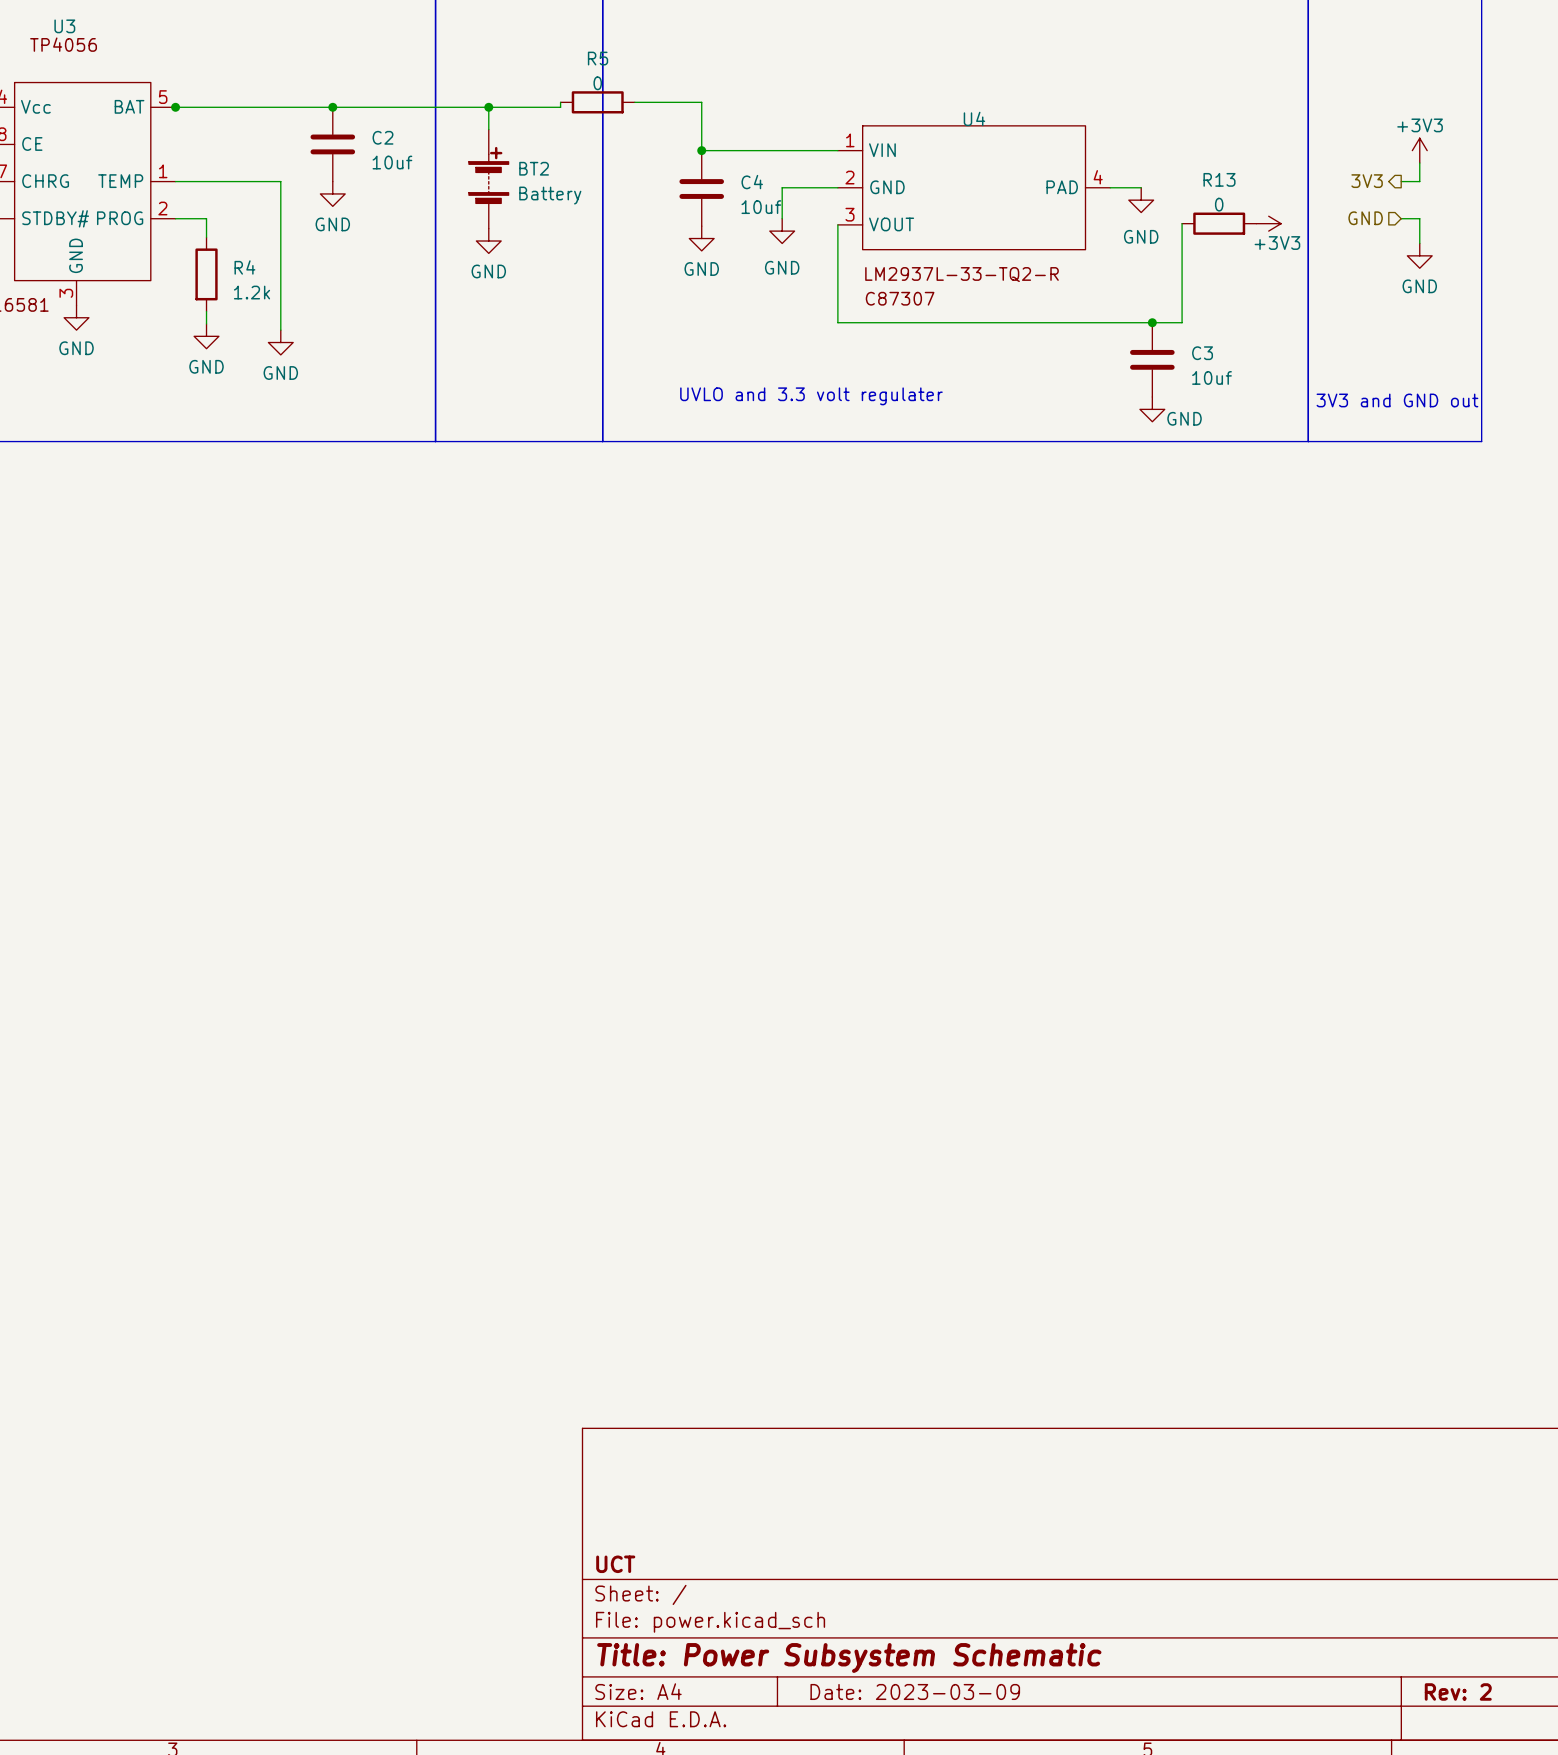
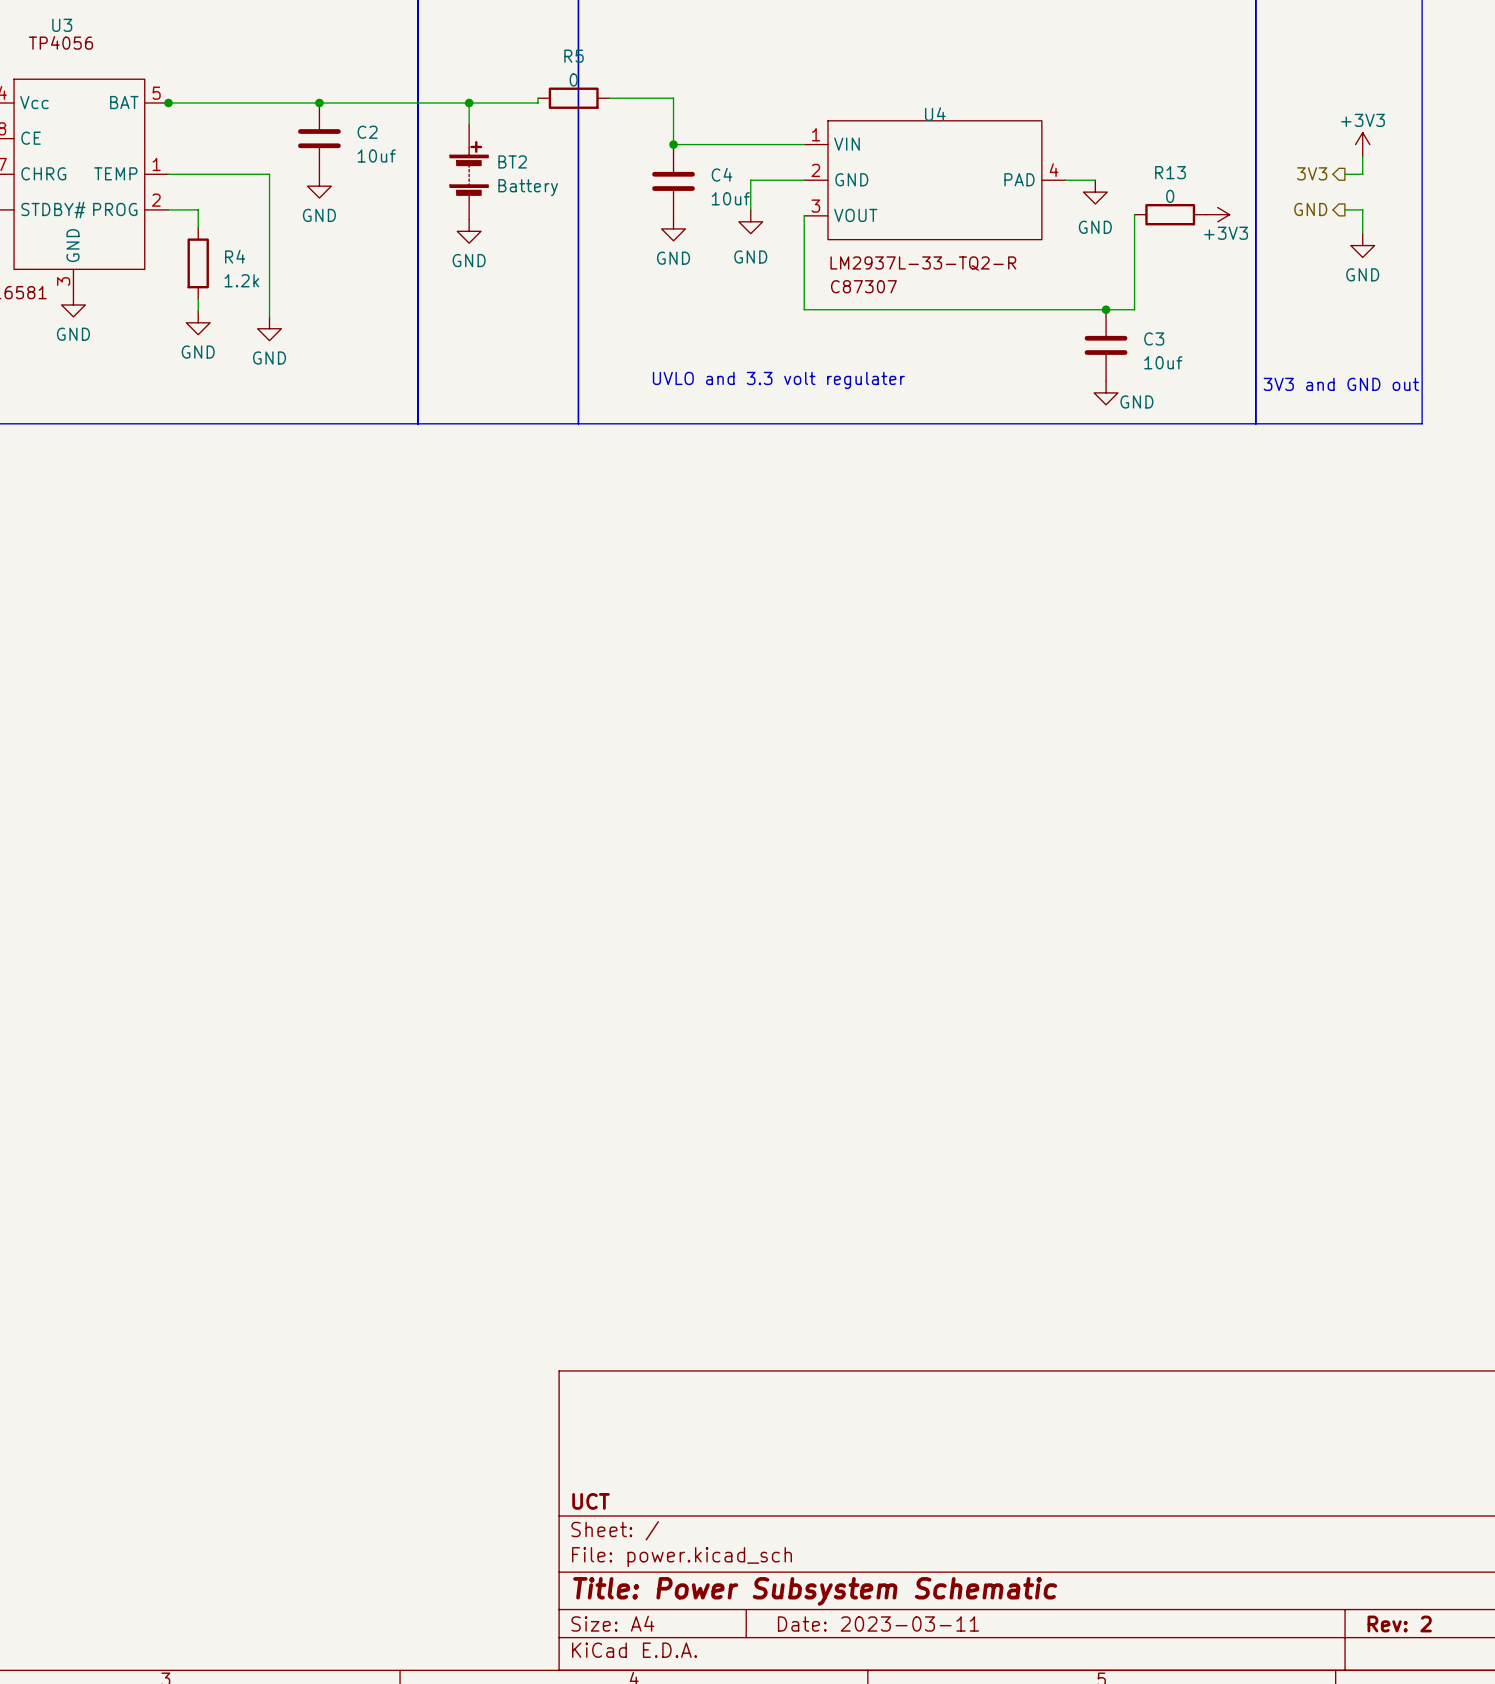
hierarchical label shape: input (1365, 218) -> output (1310, 209)
title block: Date: 2023-03-09 (915, 1691) -> Date: 2023-03-11 (878, 1623)

